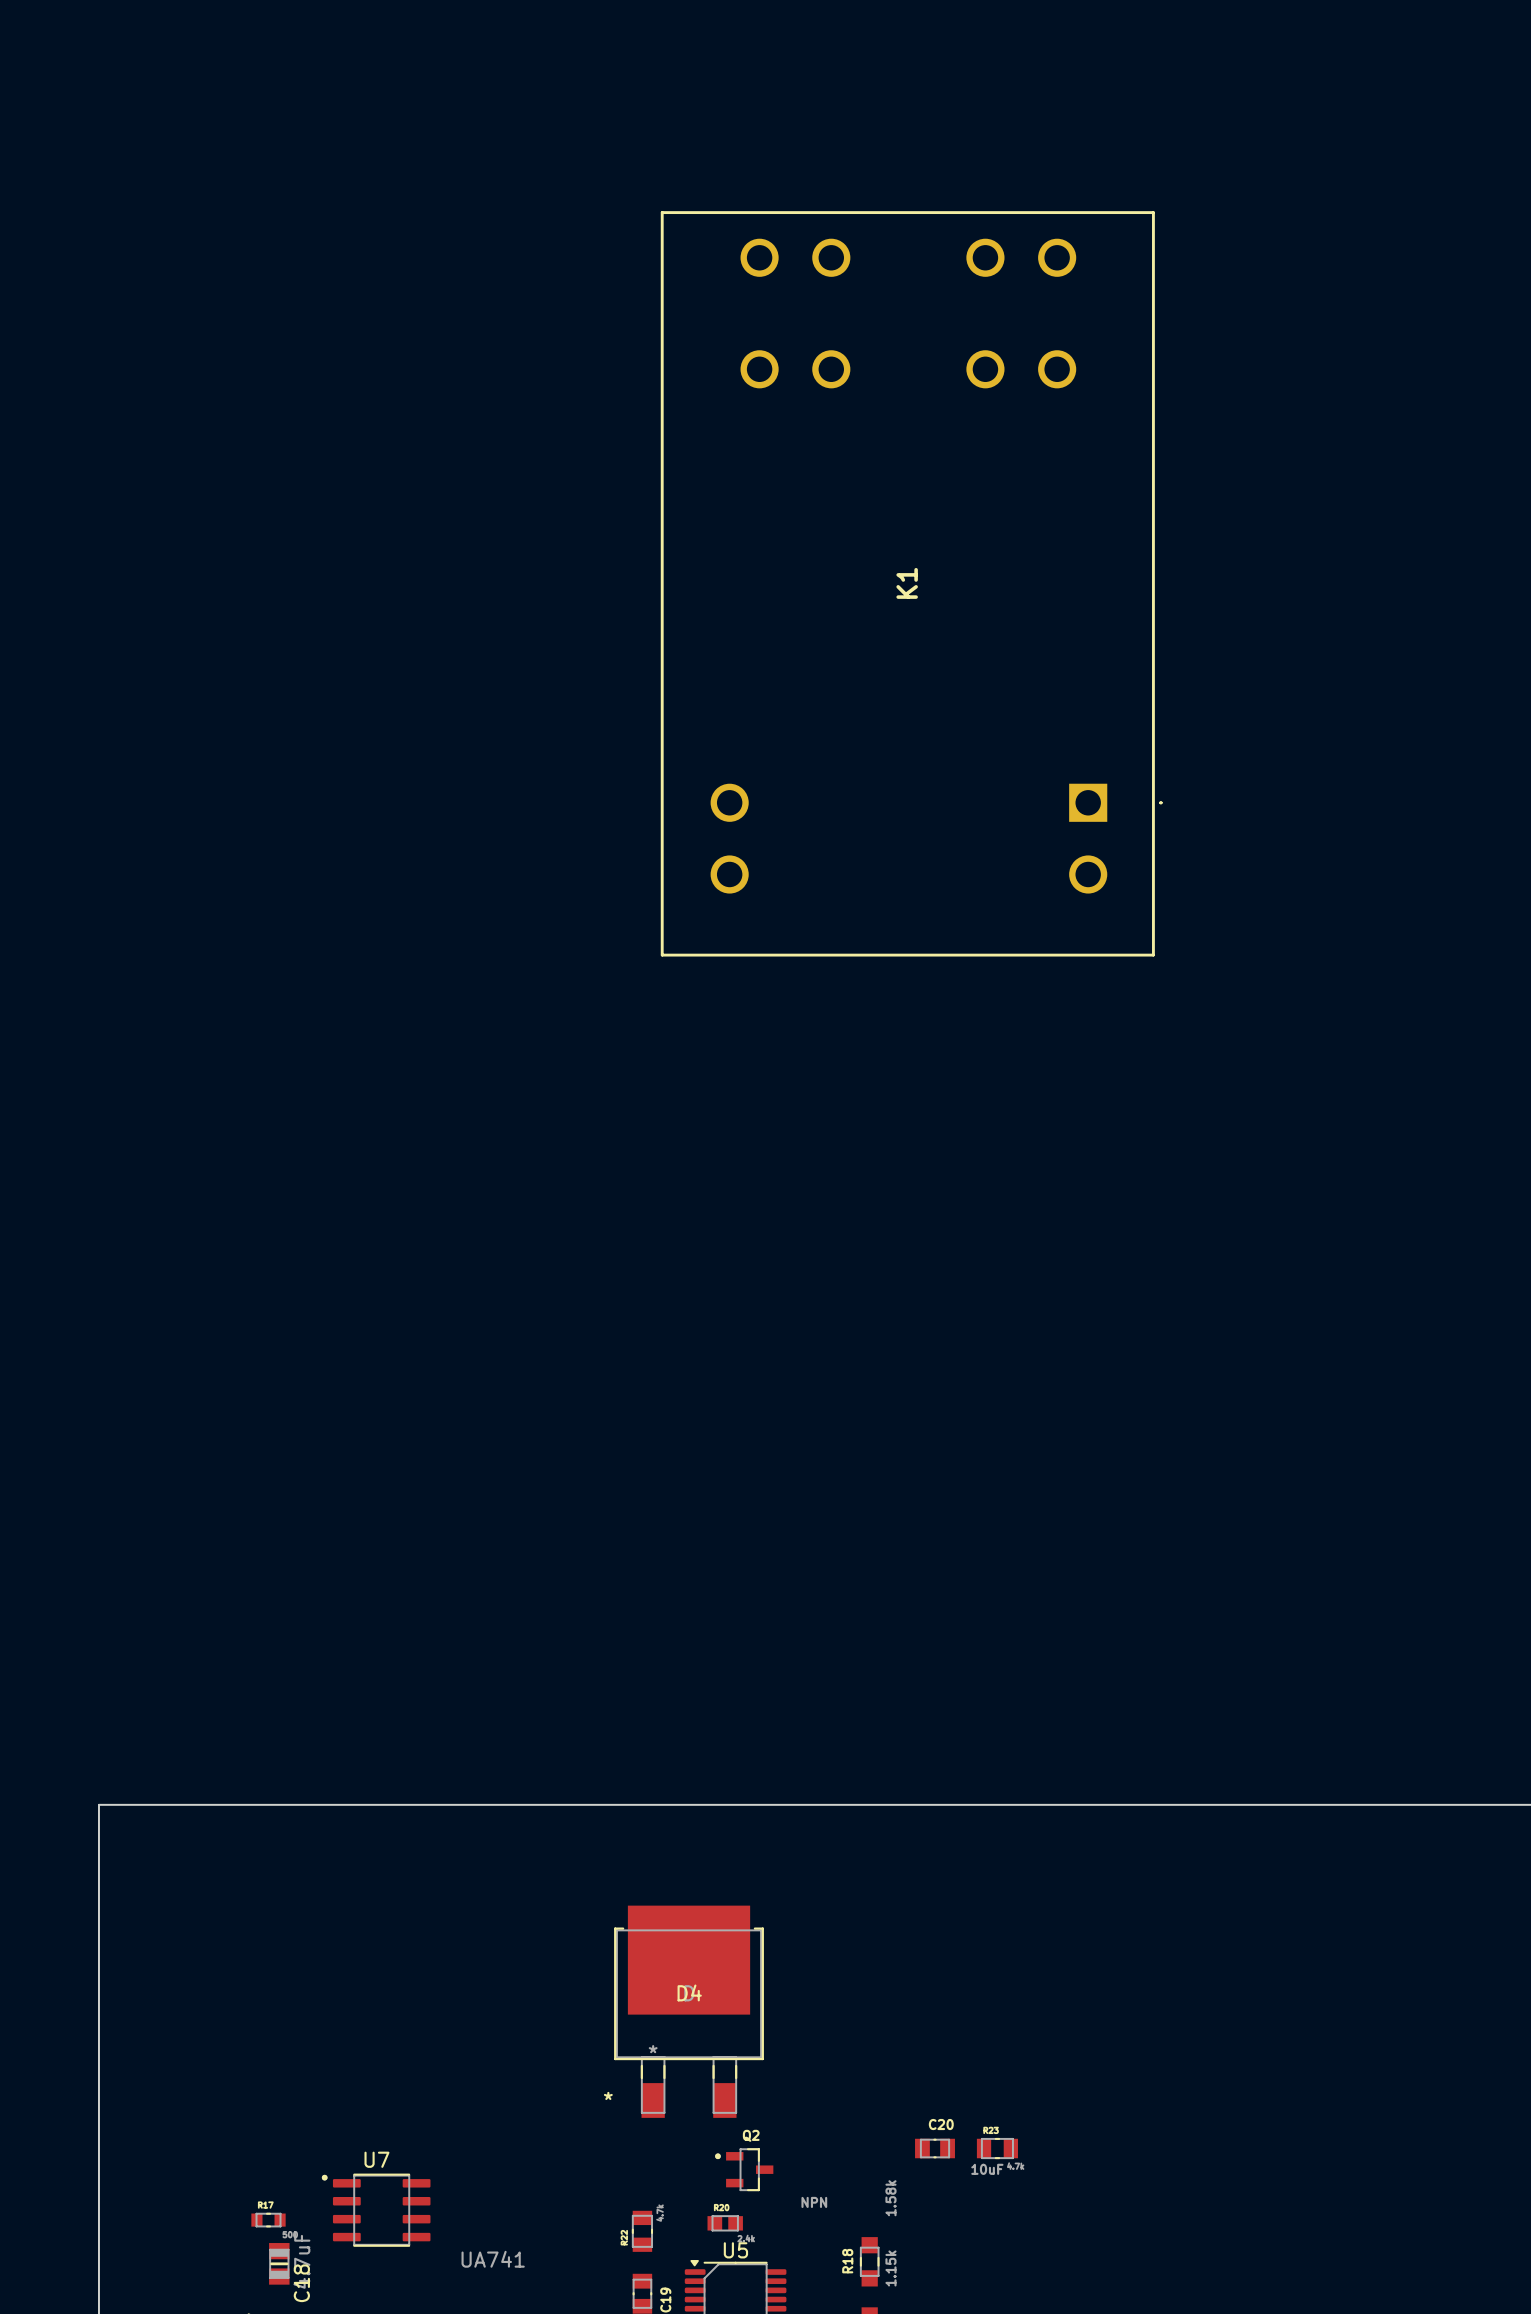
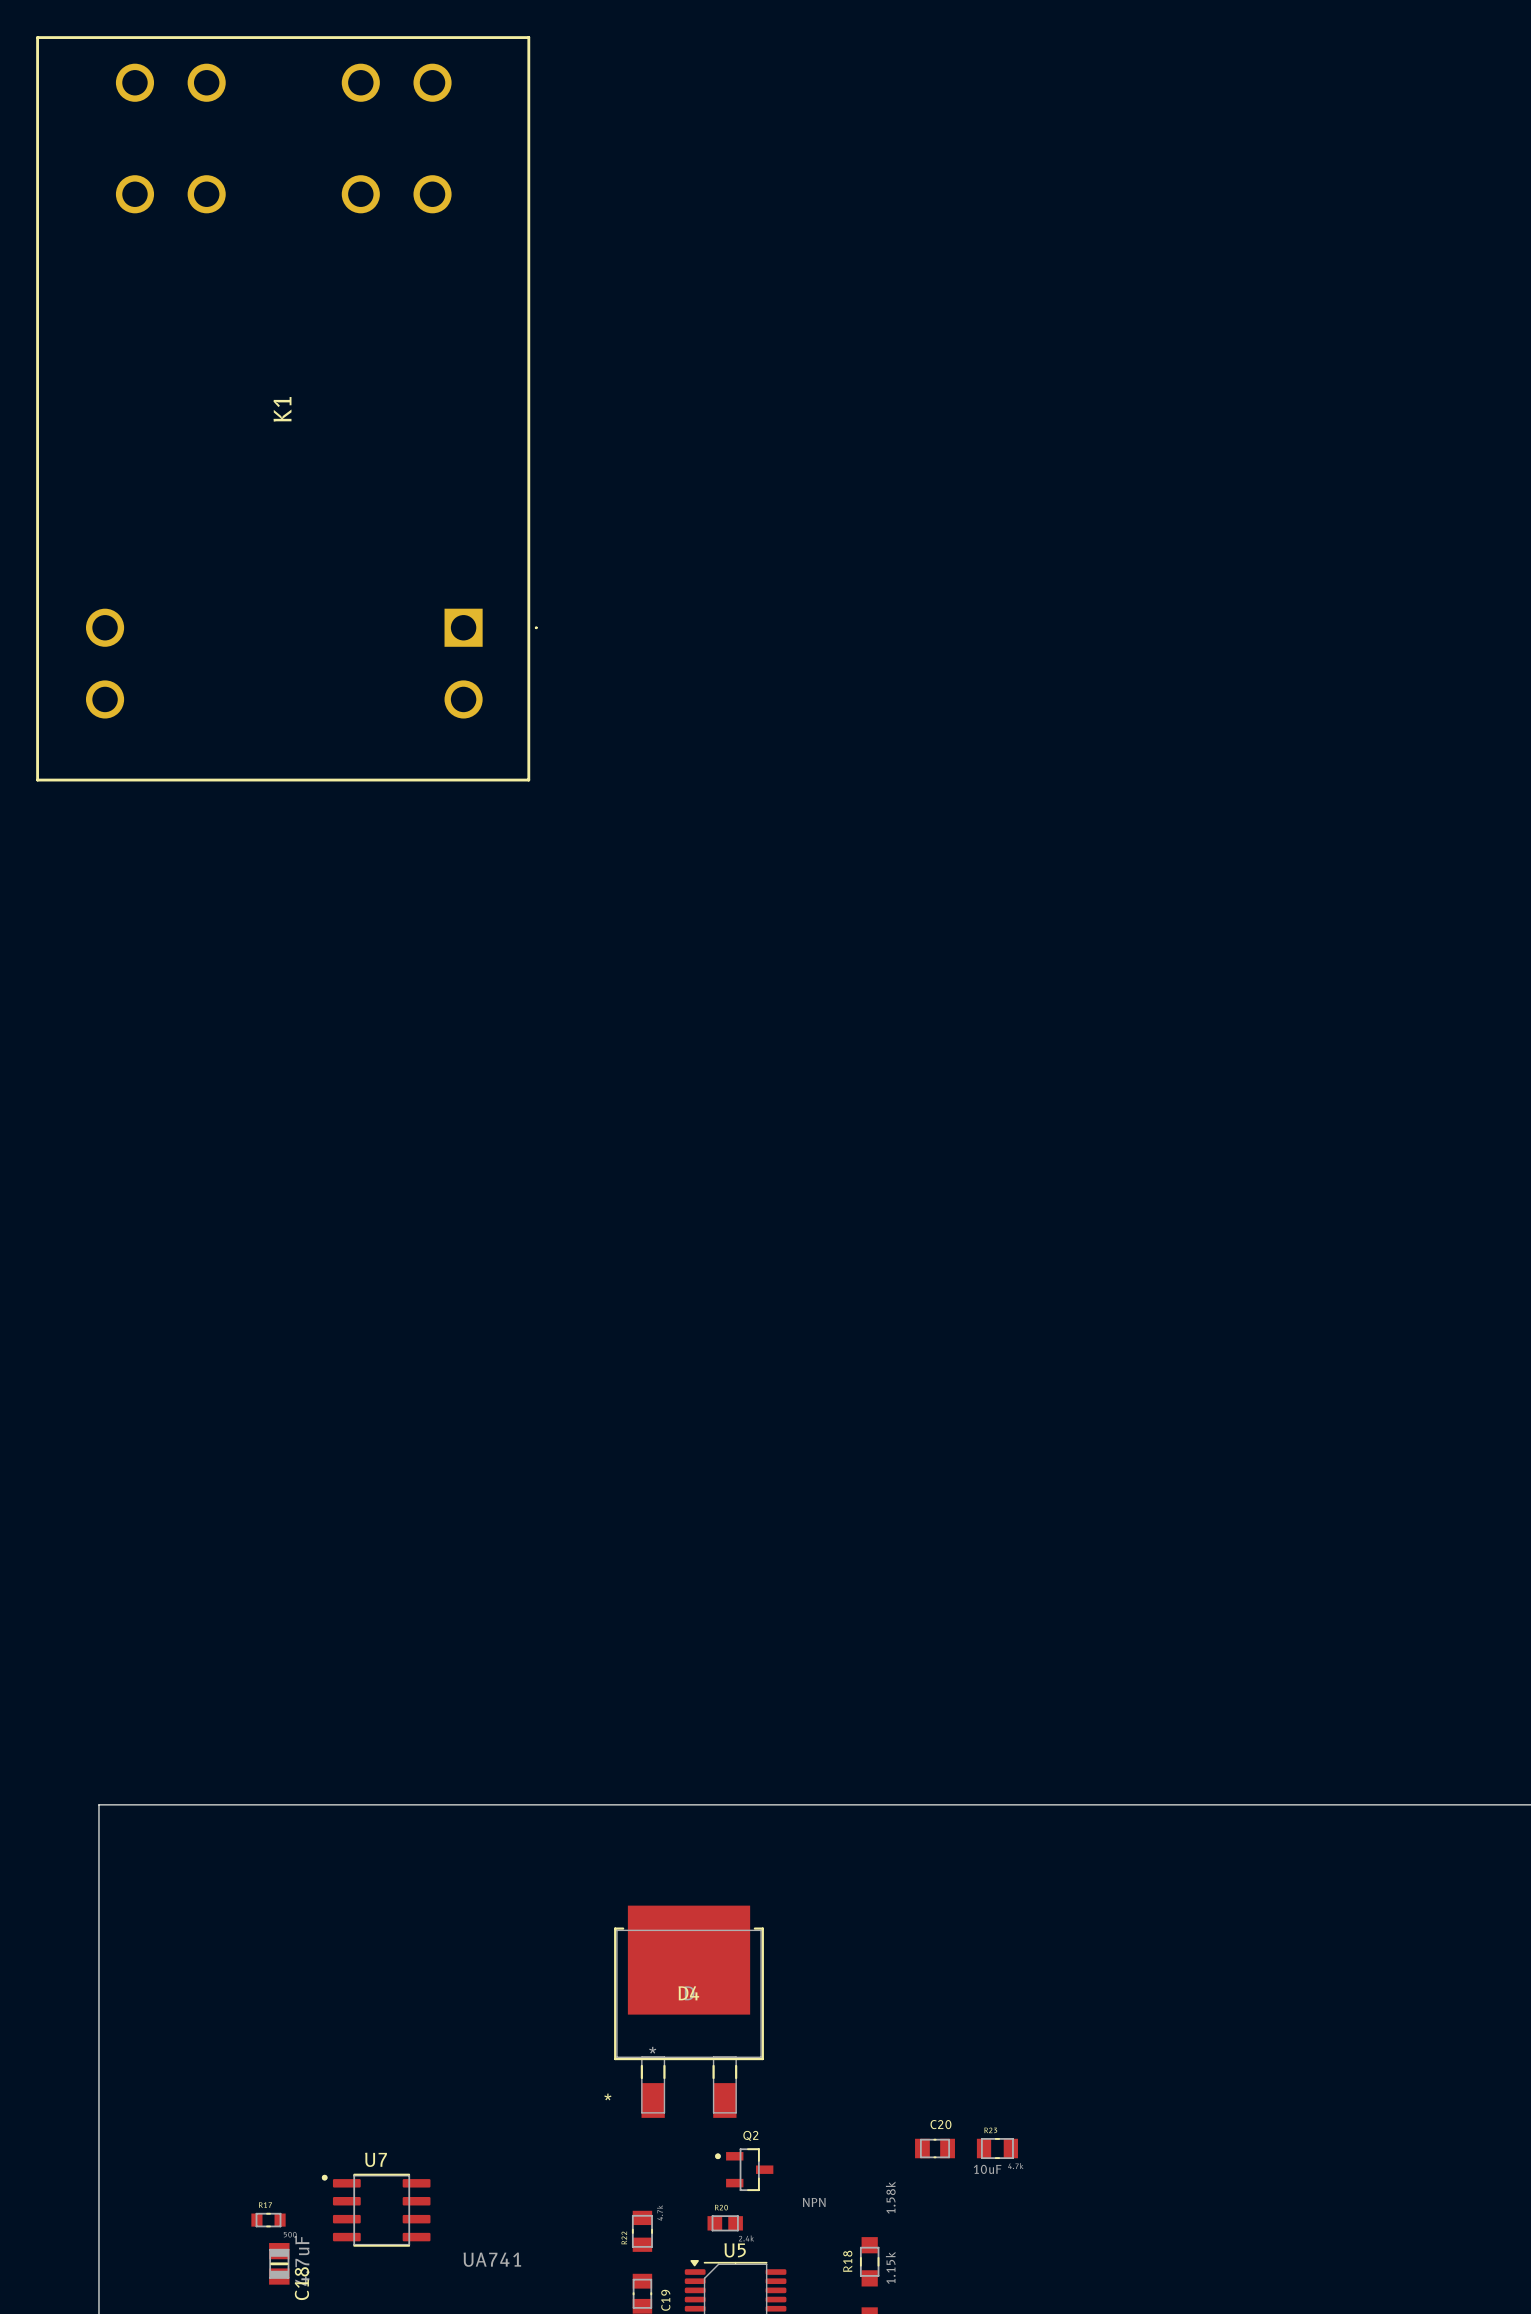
K1 position: (911, 583) -> (286, 408)

